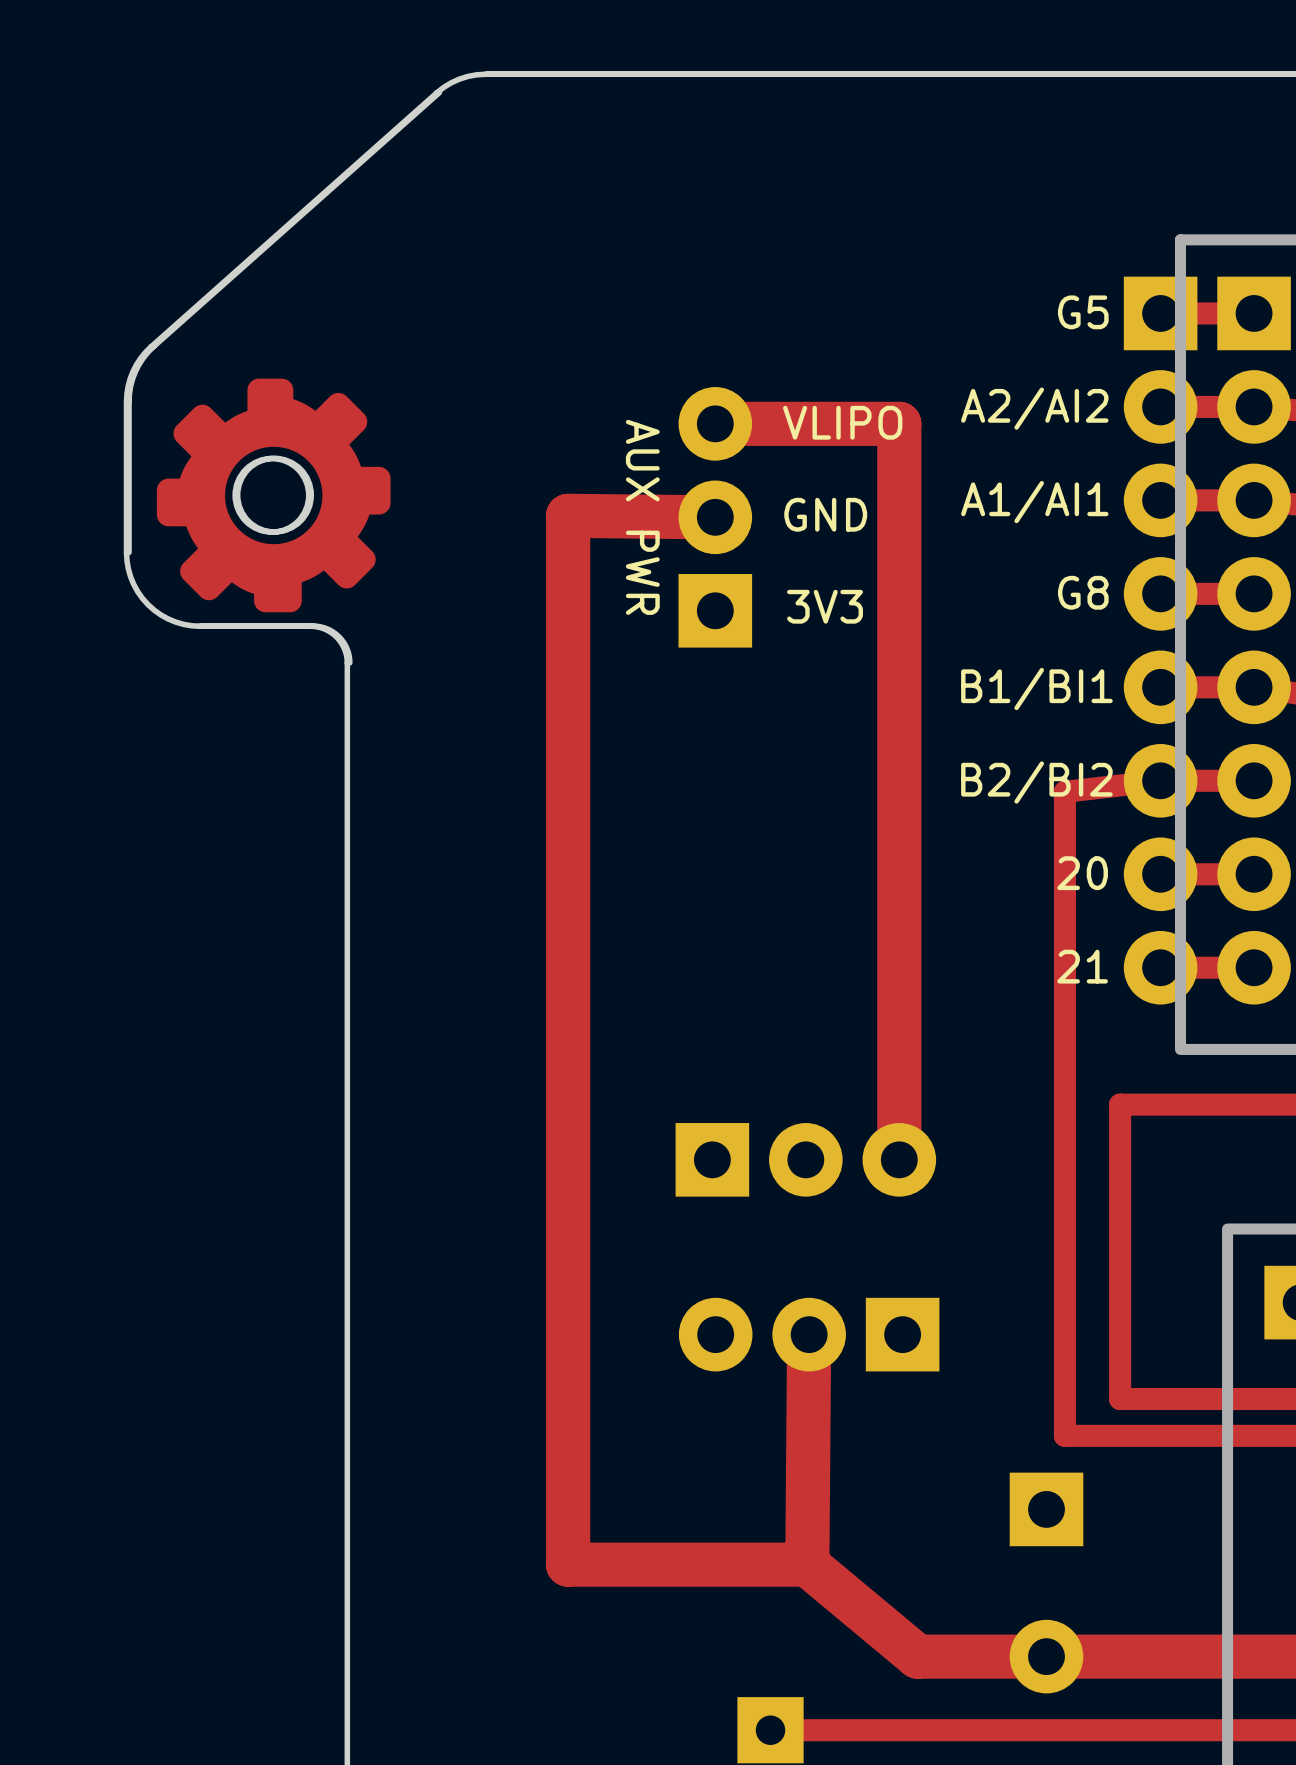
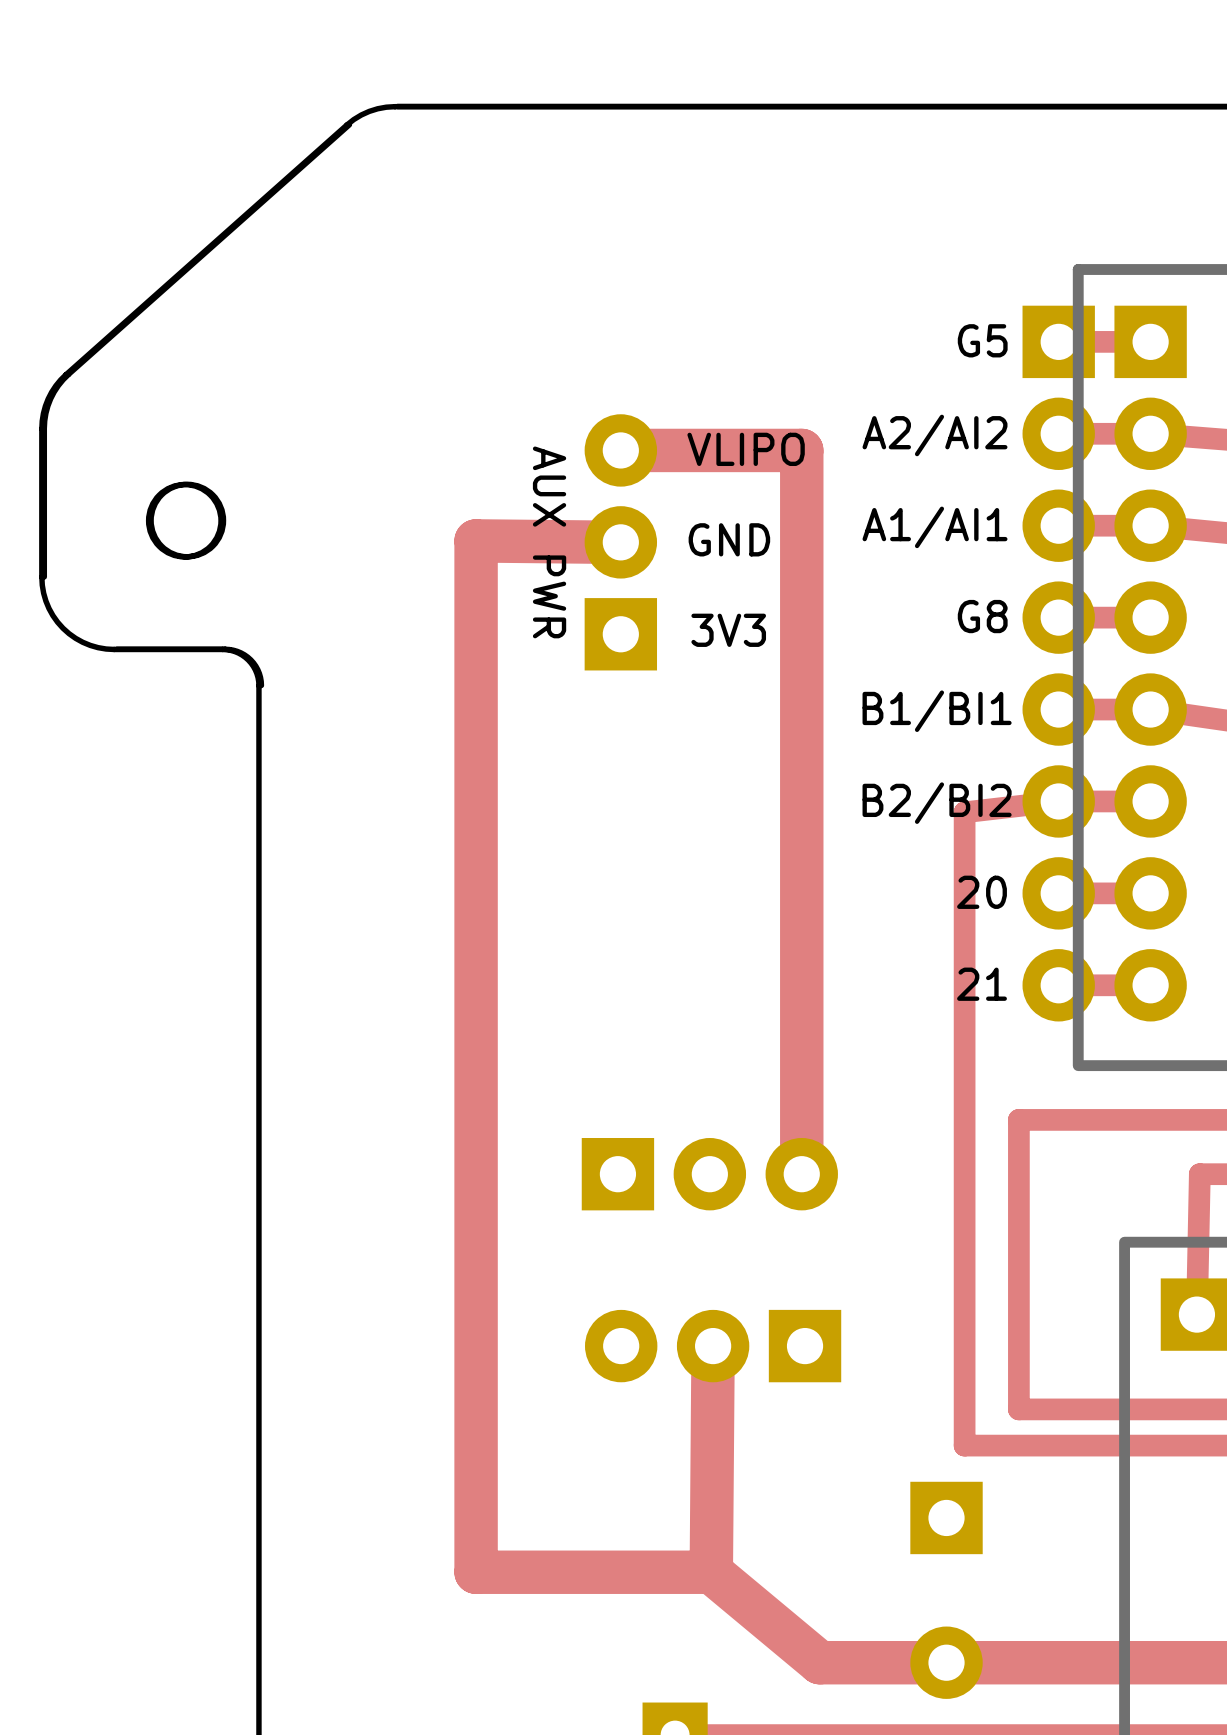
drawing: [156, 378, 391, 613] -> none

